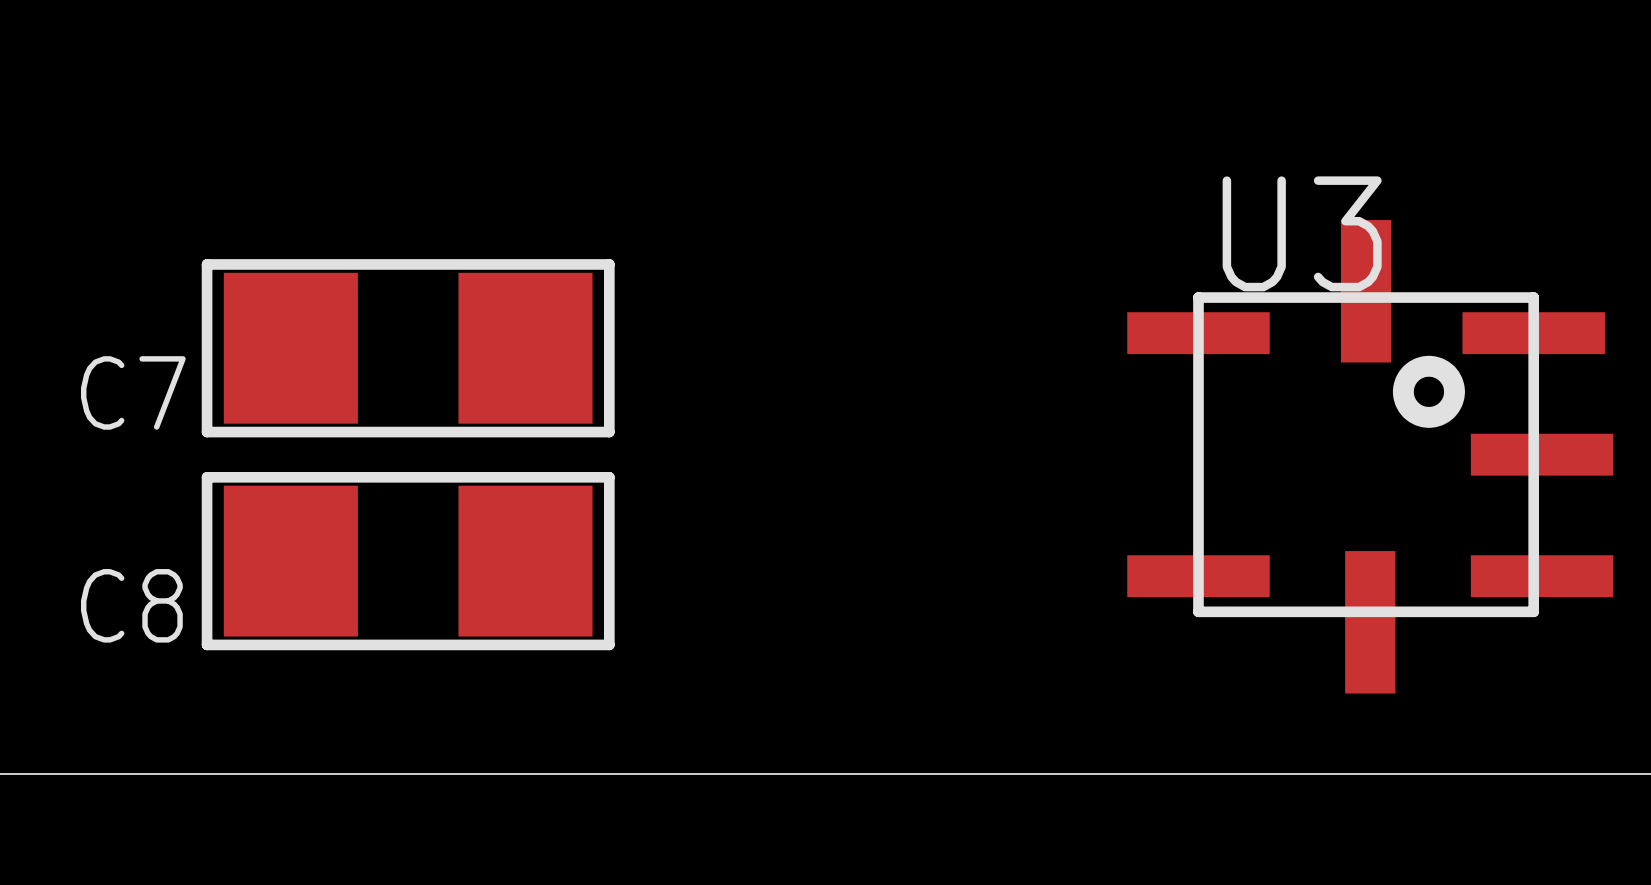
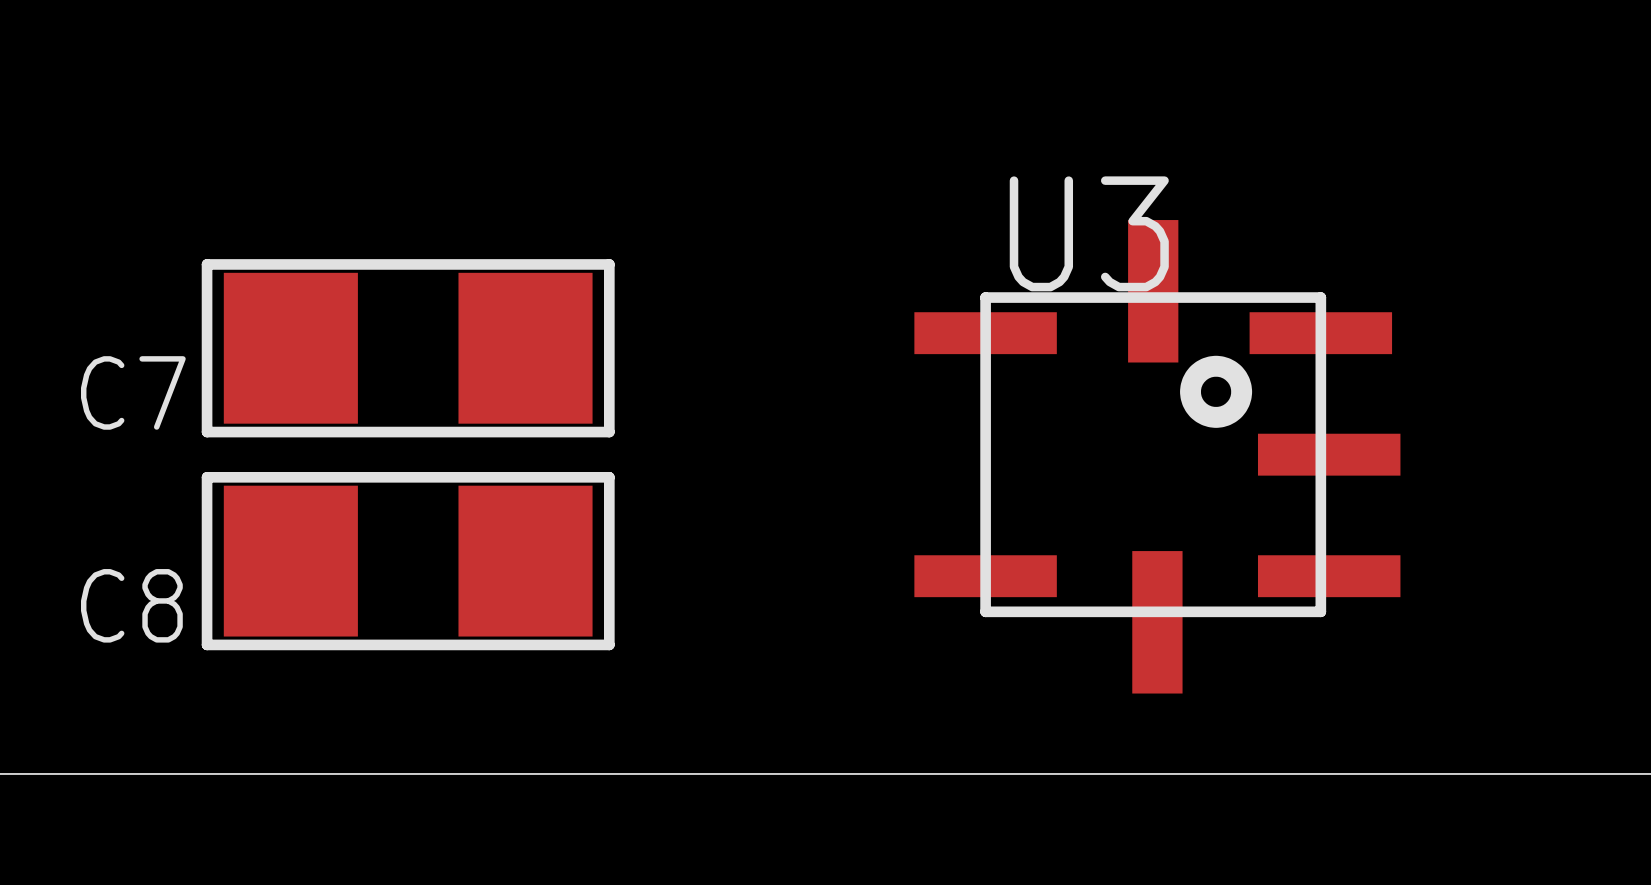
U3 position: (1370, 456) -> (1157, 456)

